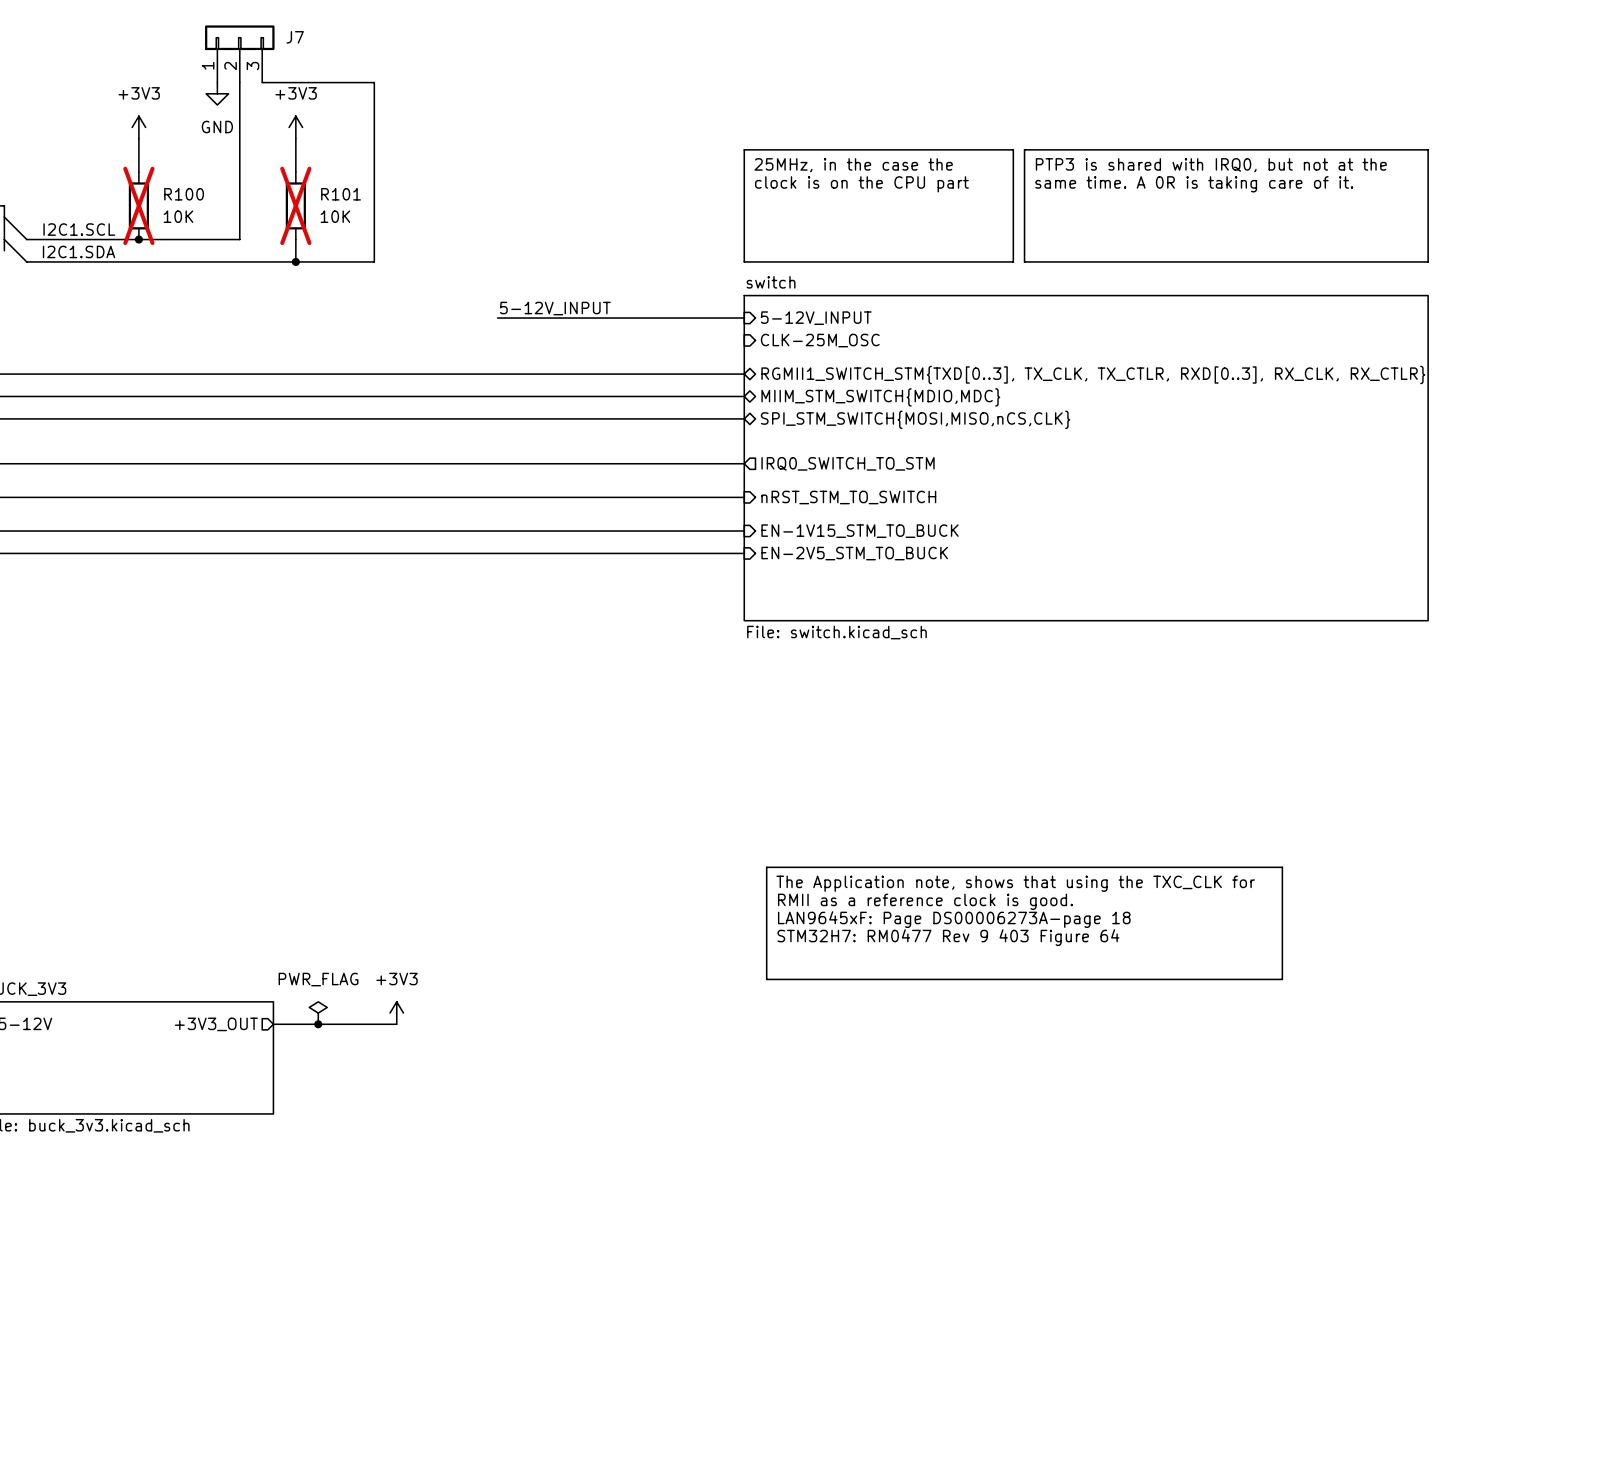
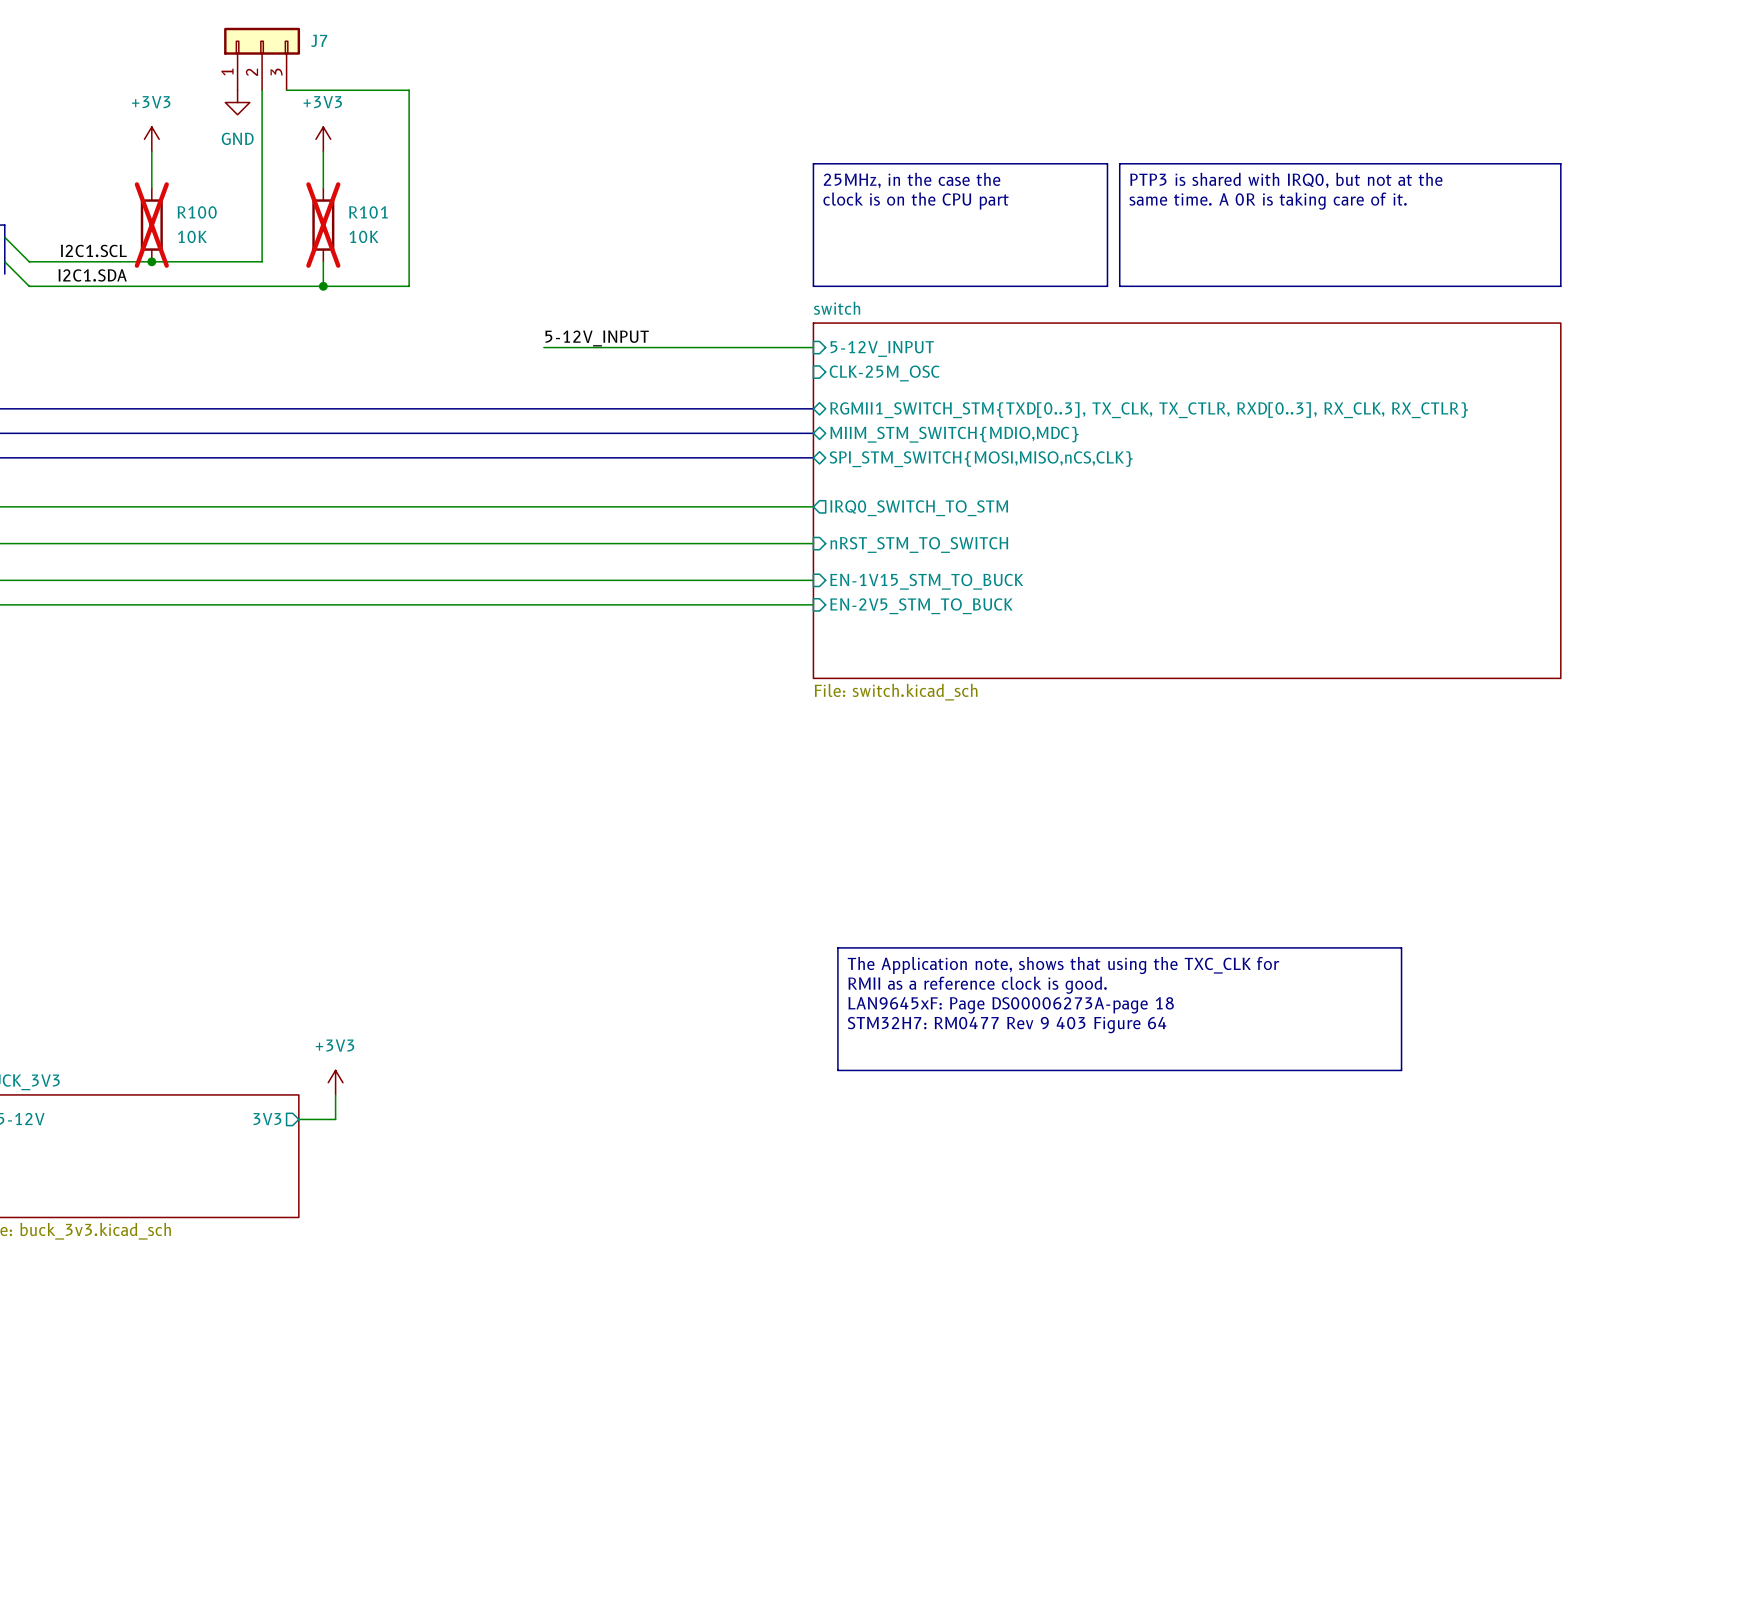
power symbol: PWR_FLAG (318, 1013) -> none
power symbol position: +3V3 (396, 1013) -> +3V3 (335, 1082)
sheet pin: +3V3_OUT (216, 1024) -> 3V3 (267, 1119)
wire: (307, 1024) (396, 1024) -> (335, 1119) (335, 1094)
junction: (318, 1024) -> none

